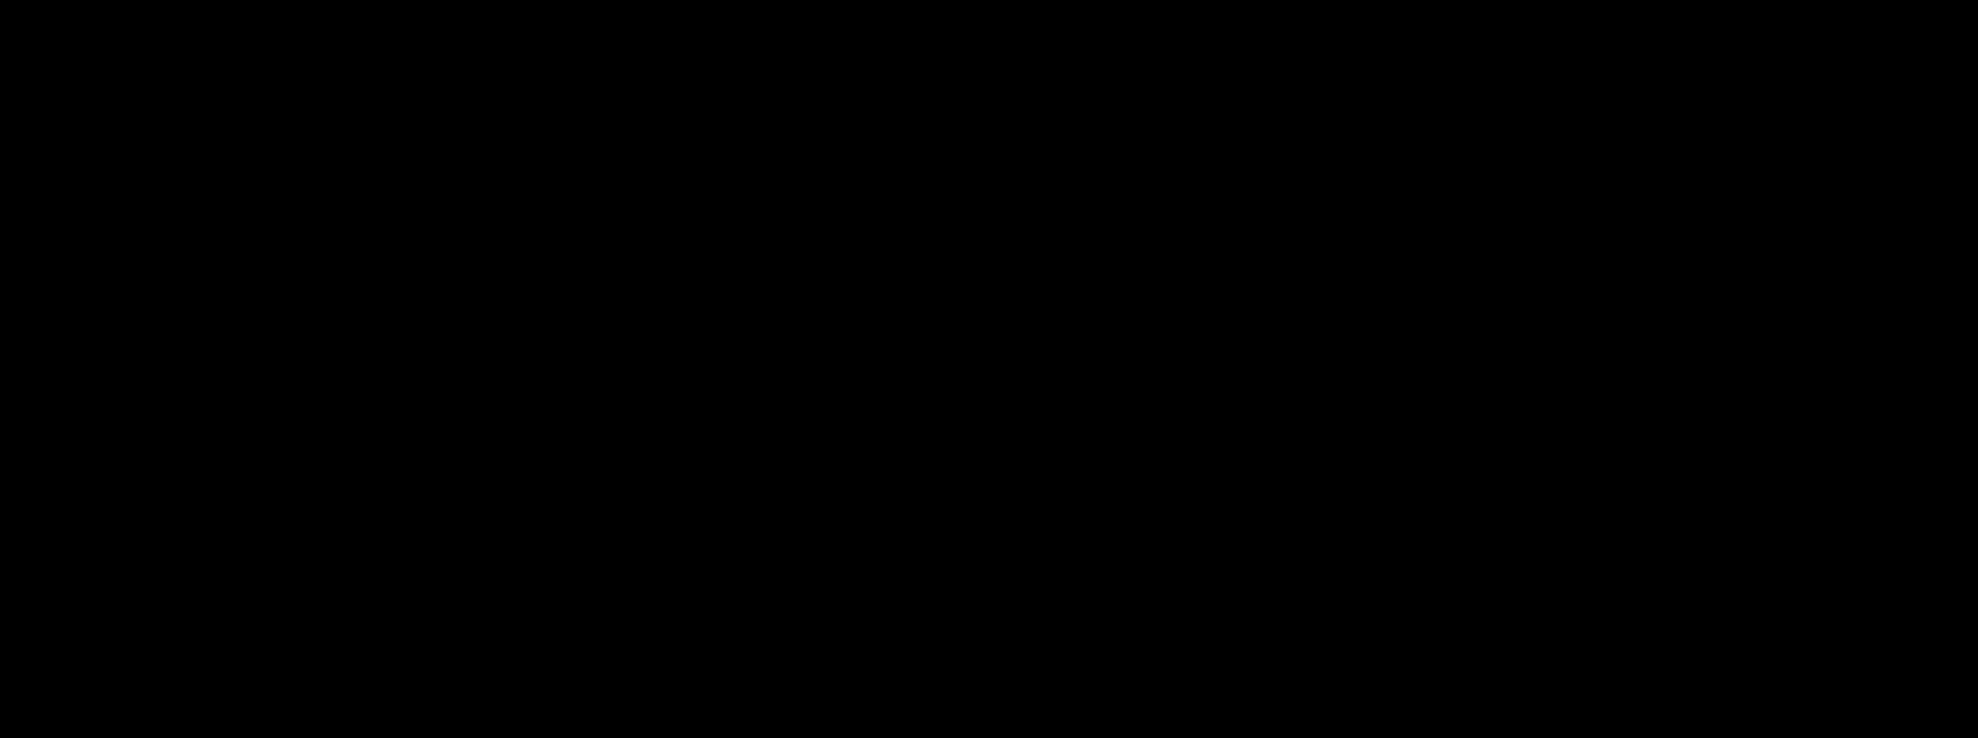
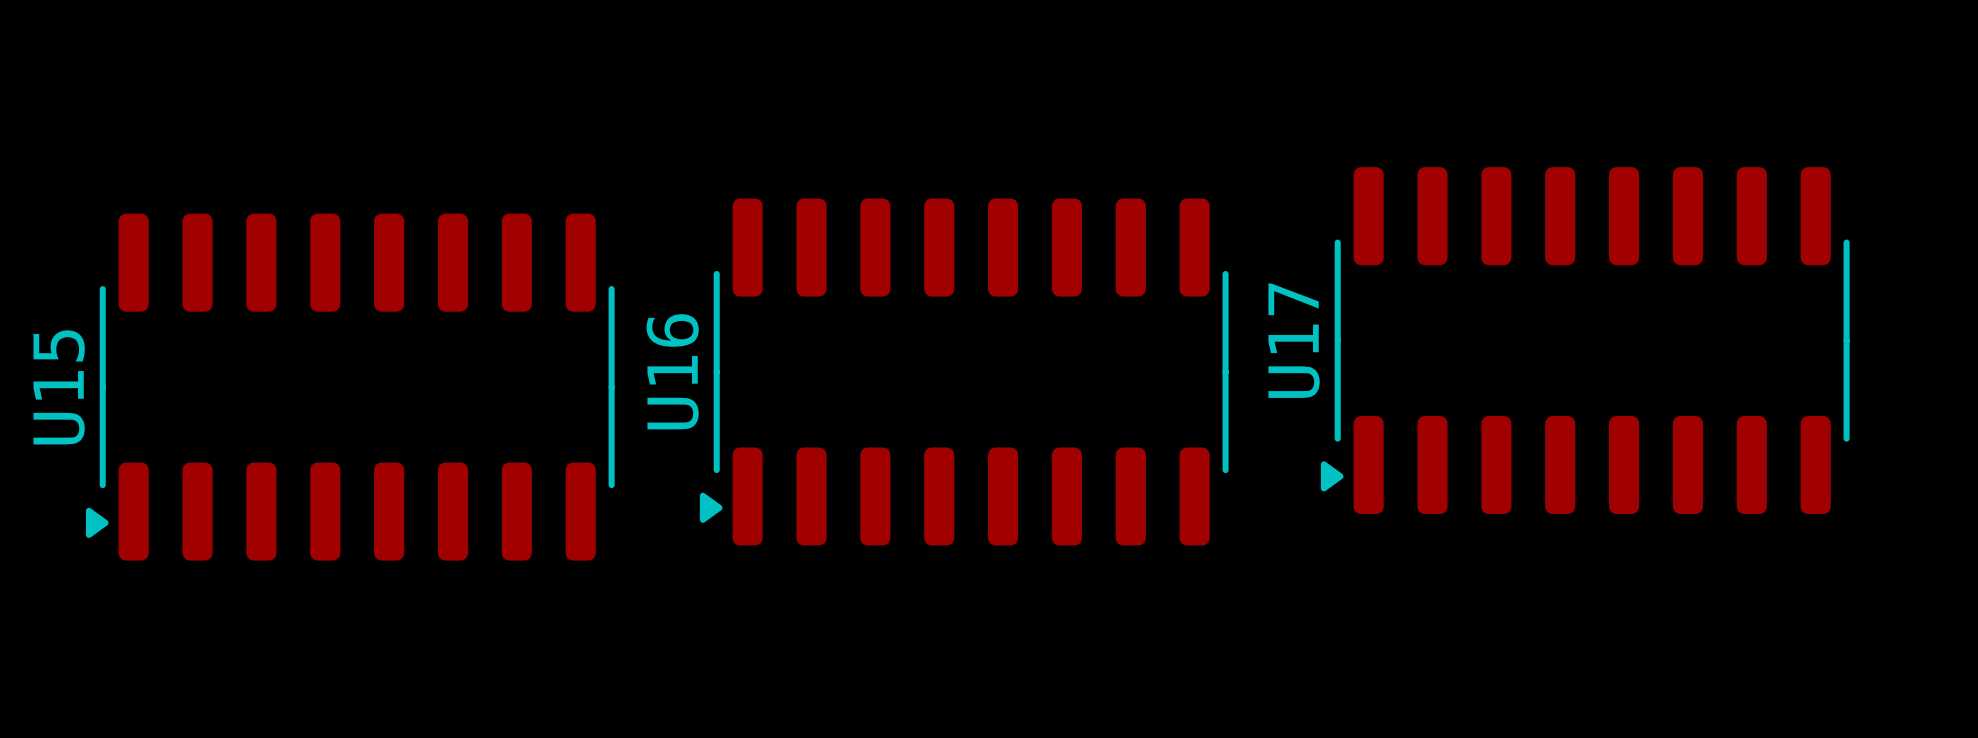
U17: none -> (1585, 340)
U16: none -> (964, 372)
U15: none -> (350, 387)

